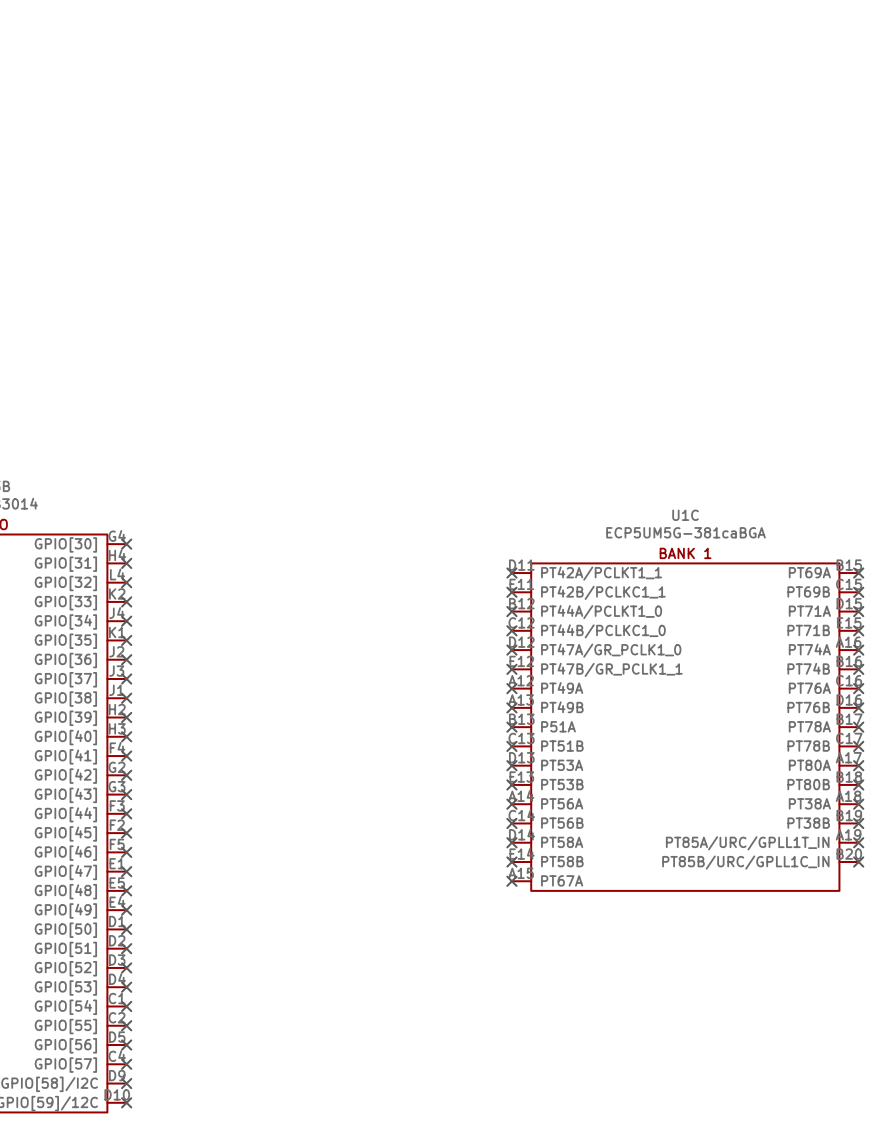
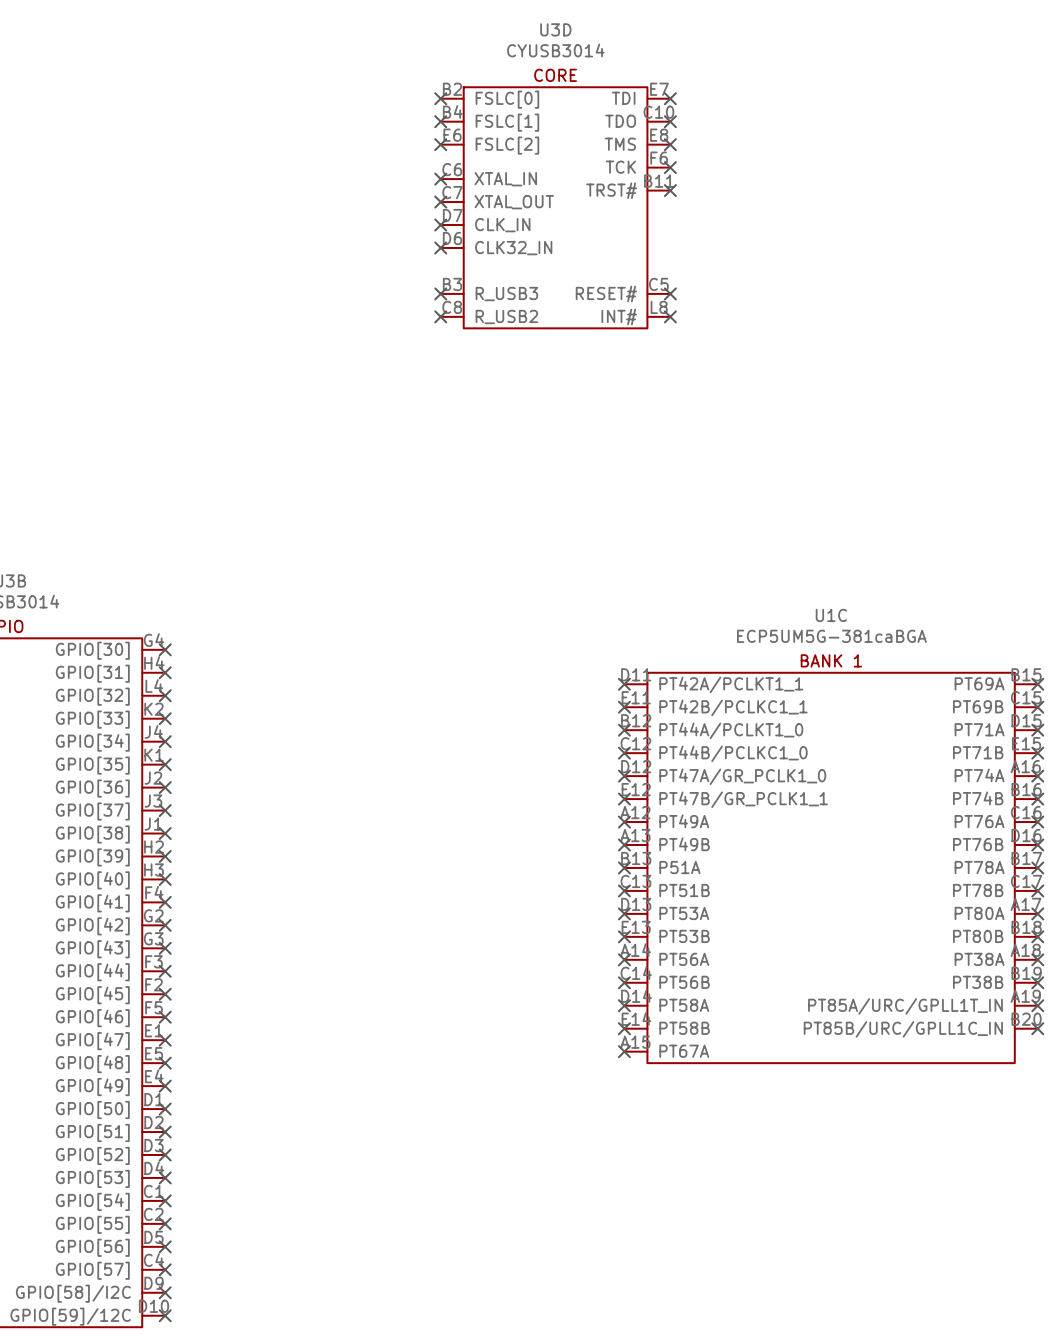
no-connect mark: none -> (440, 98)
no-connect mark: none -> (670, 98)
no-connect mark: none -> (440, 121)
no-connect mark: none -> (670, 121)
no-connect mark: none -> (440, 144)
no-connect mark: none -> (670, 144)
no-connect mark: none -> (670, 167)
no-connect mark: none -> (440, 179)
no-connect mark: none -> (670, 190)
no-connect mark: none -> (440, 202)
U3D: none -> CYUSB3014 (555, 207)
no-connect mark: none -> (440, 225)
no-connect mark: none -> (440, 247)
no-connect mark: none -> (440, 293)
no-connect mark: none -> (670, 293)
no-connect mark: none -> (440, 316)
no-connect mark: none -> (670, 316)

